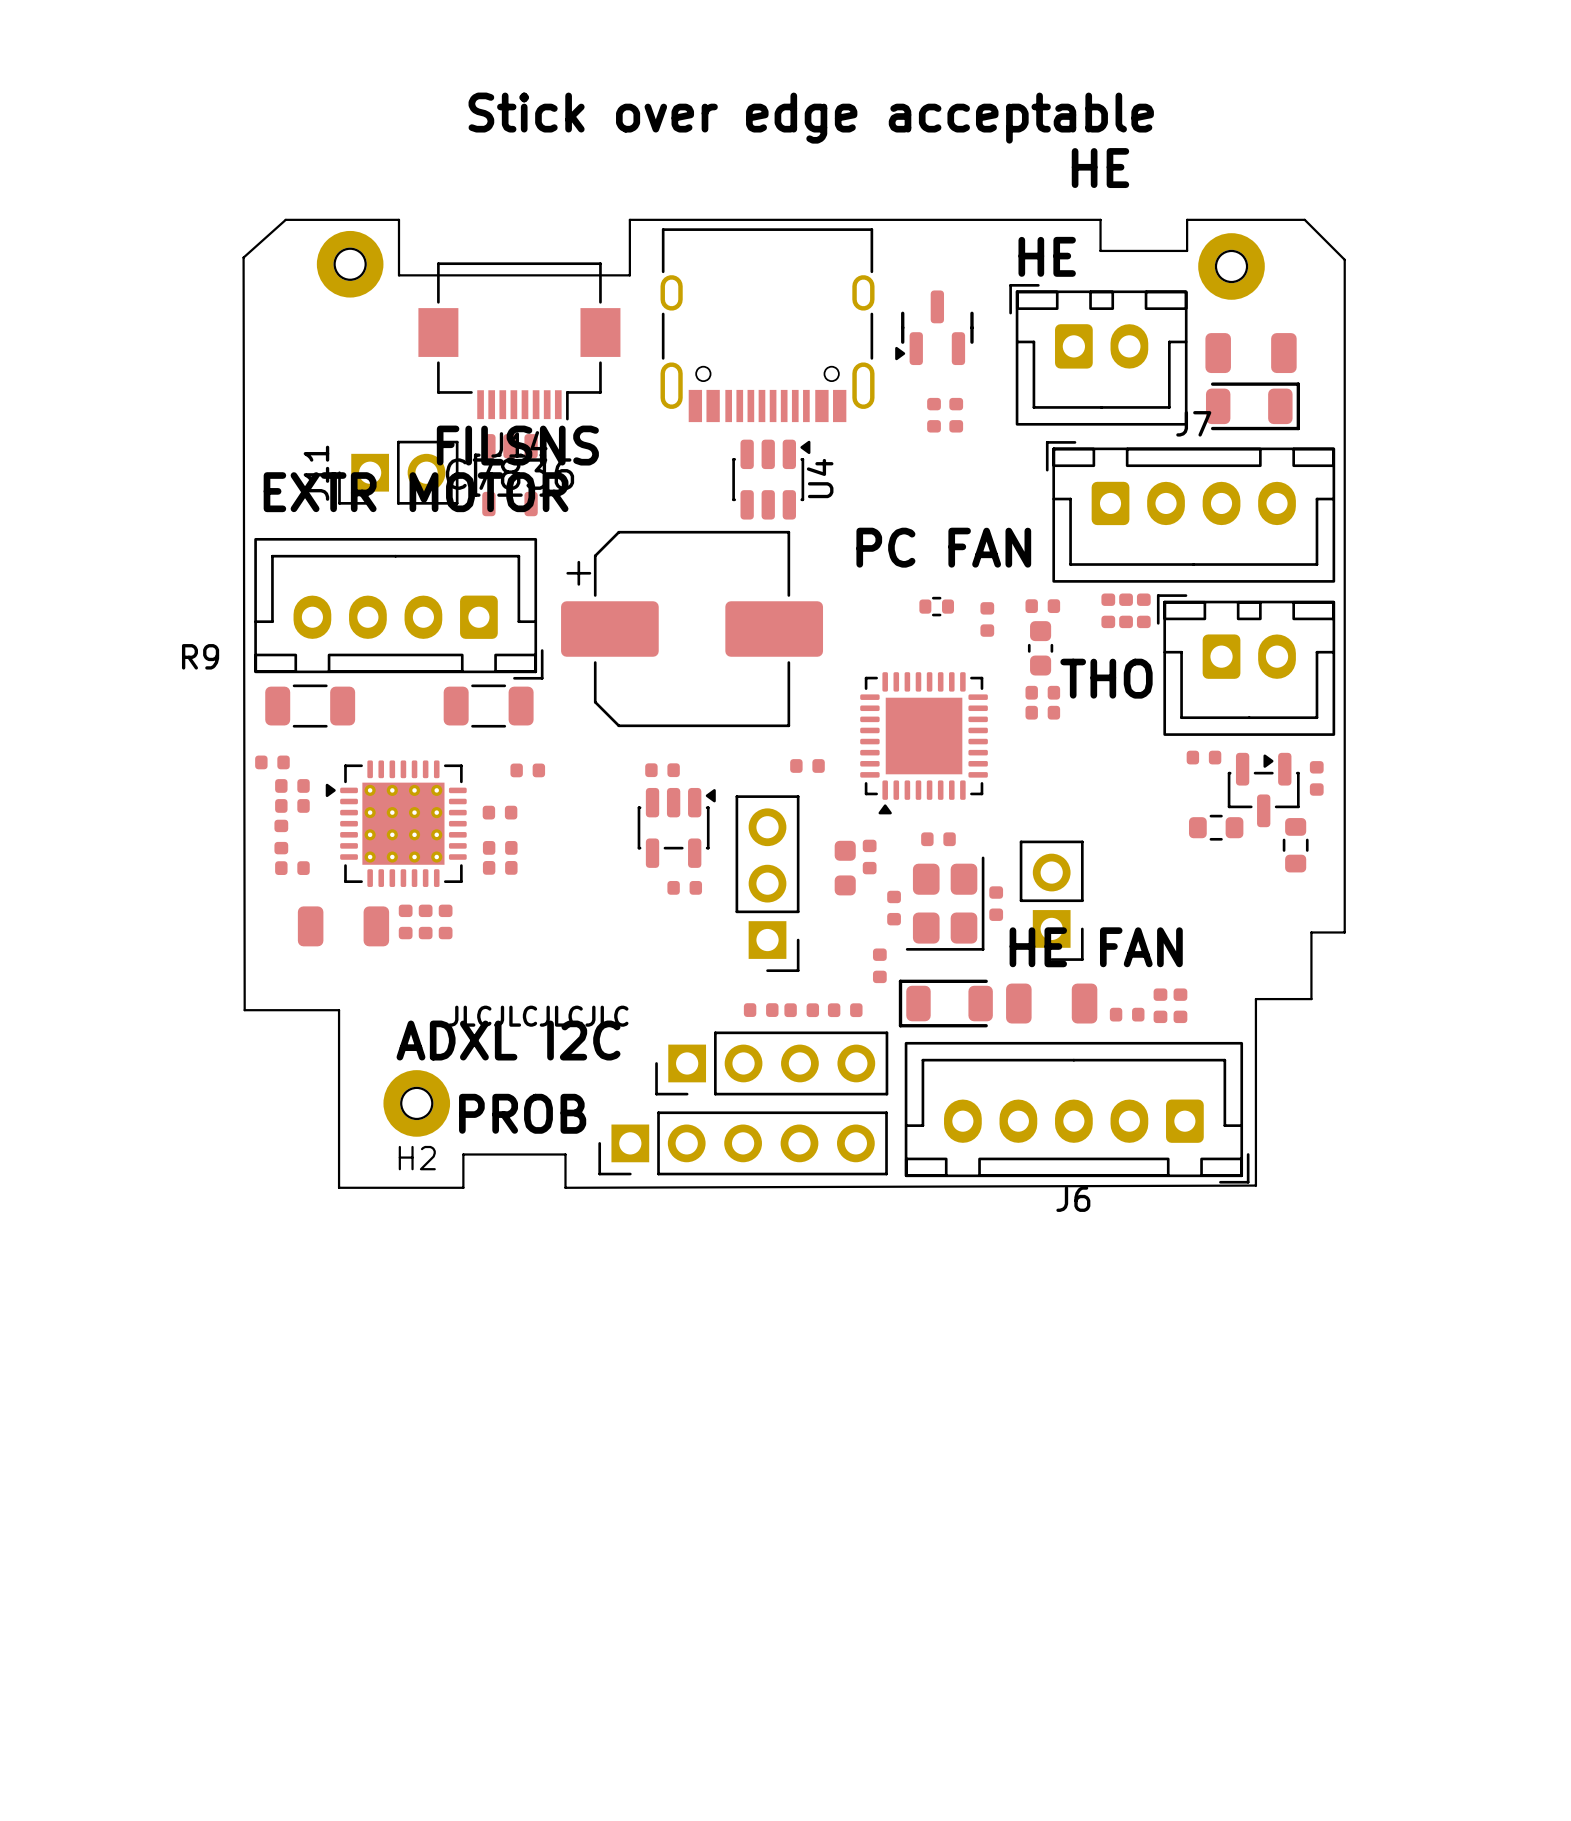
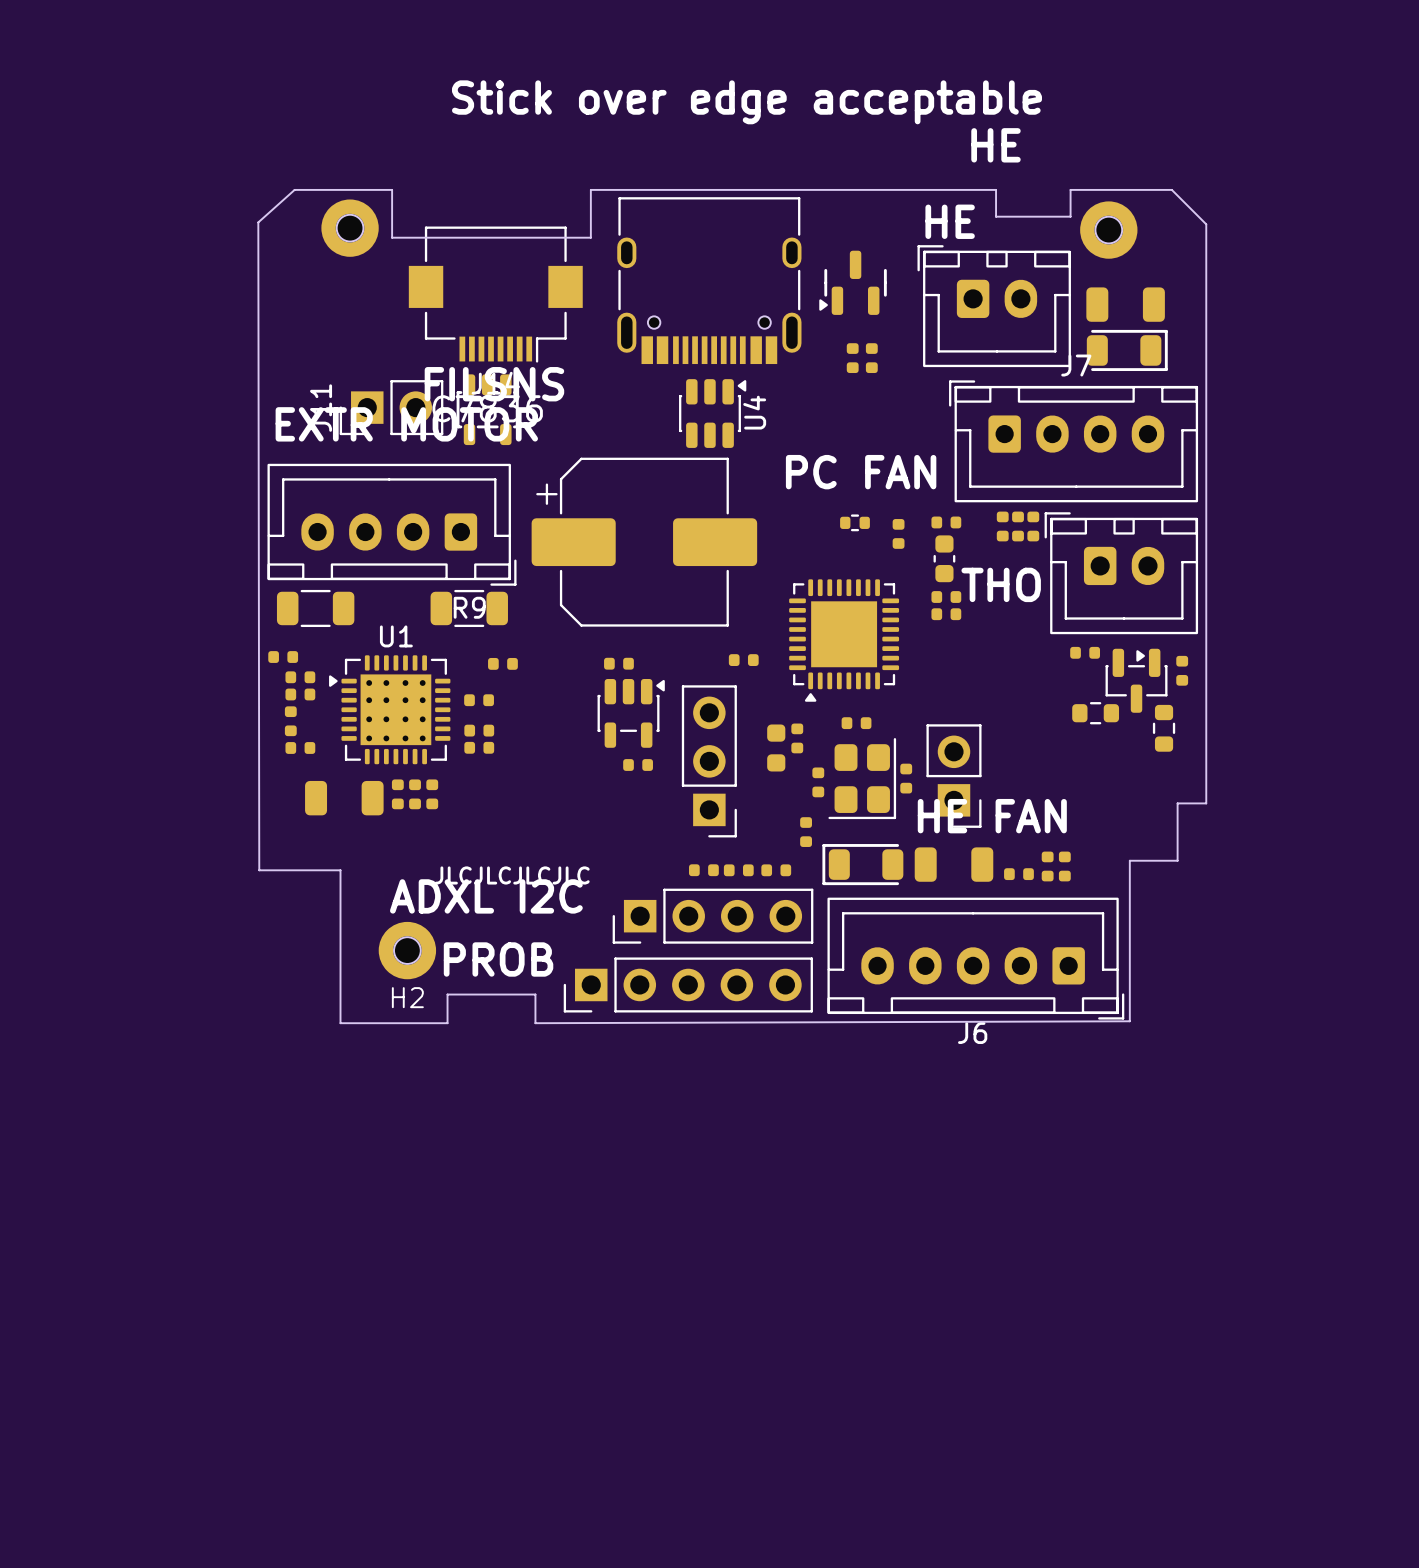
R9 name position: R9 (200, 656) -> R9 (469, 607)
part: (396, 823) -> none
U1: none -> (389, 709)

